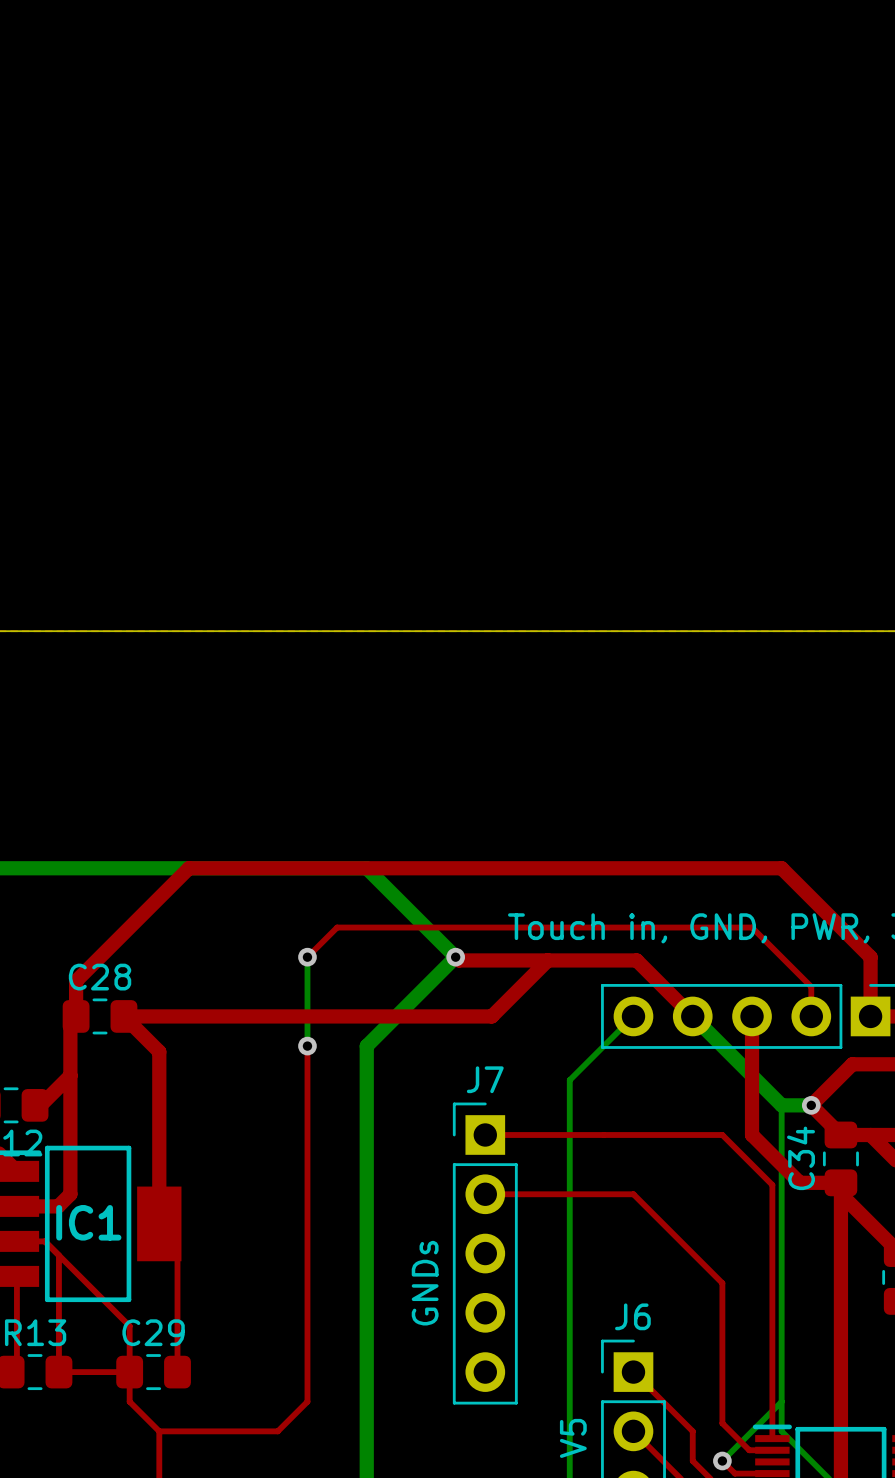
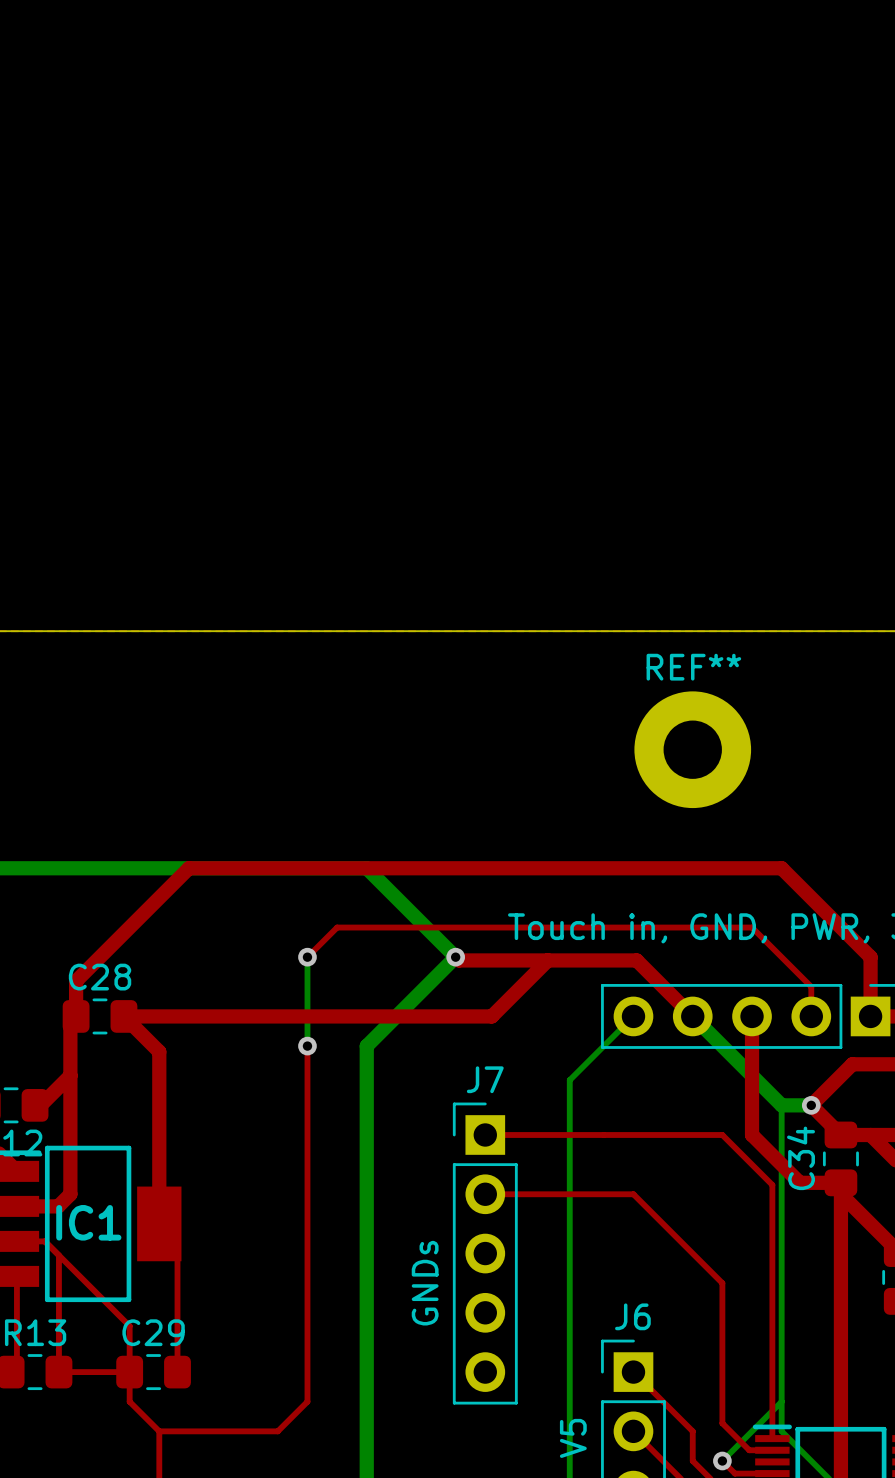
REF**: none -> (692, 749)

